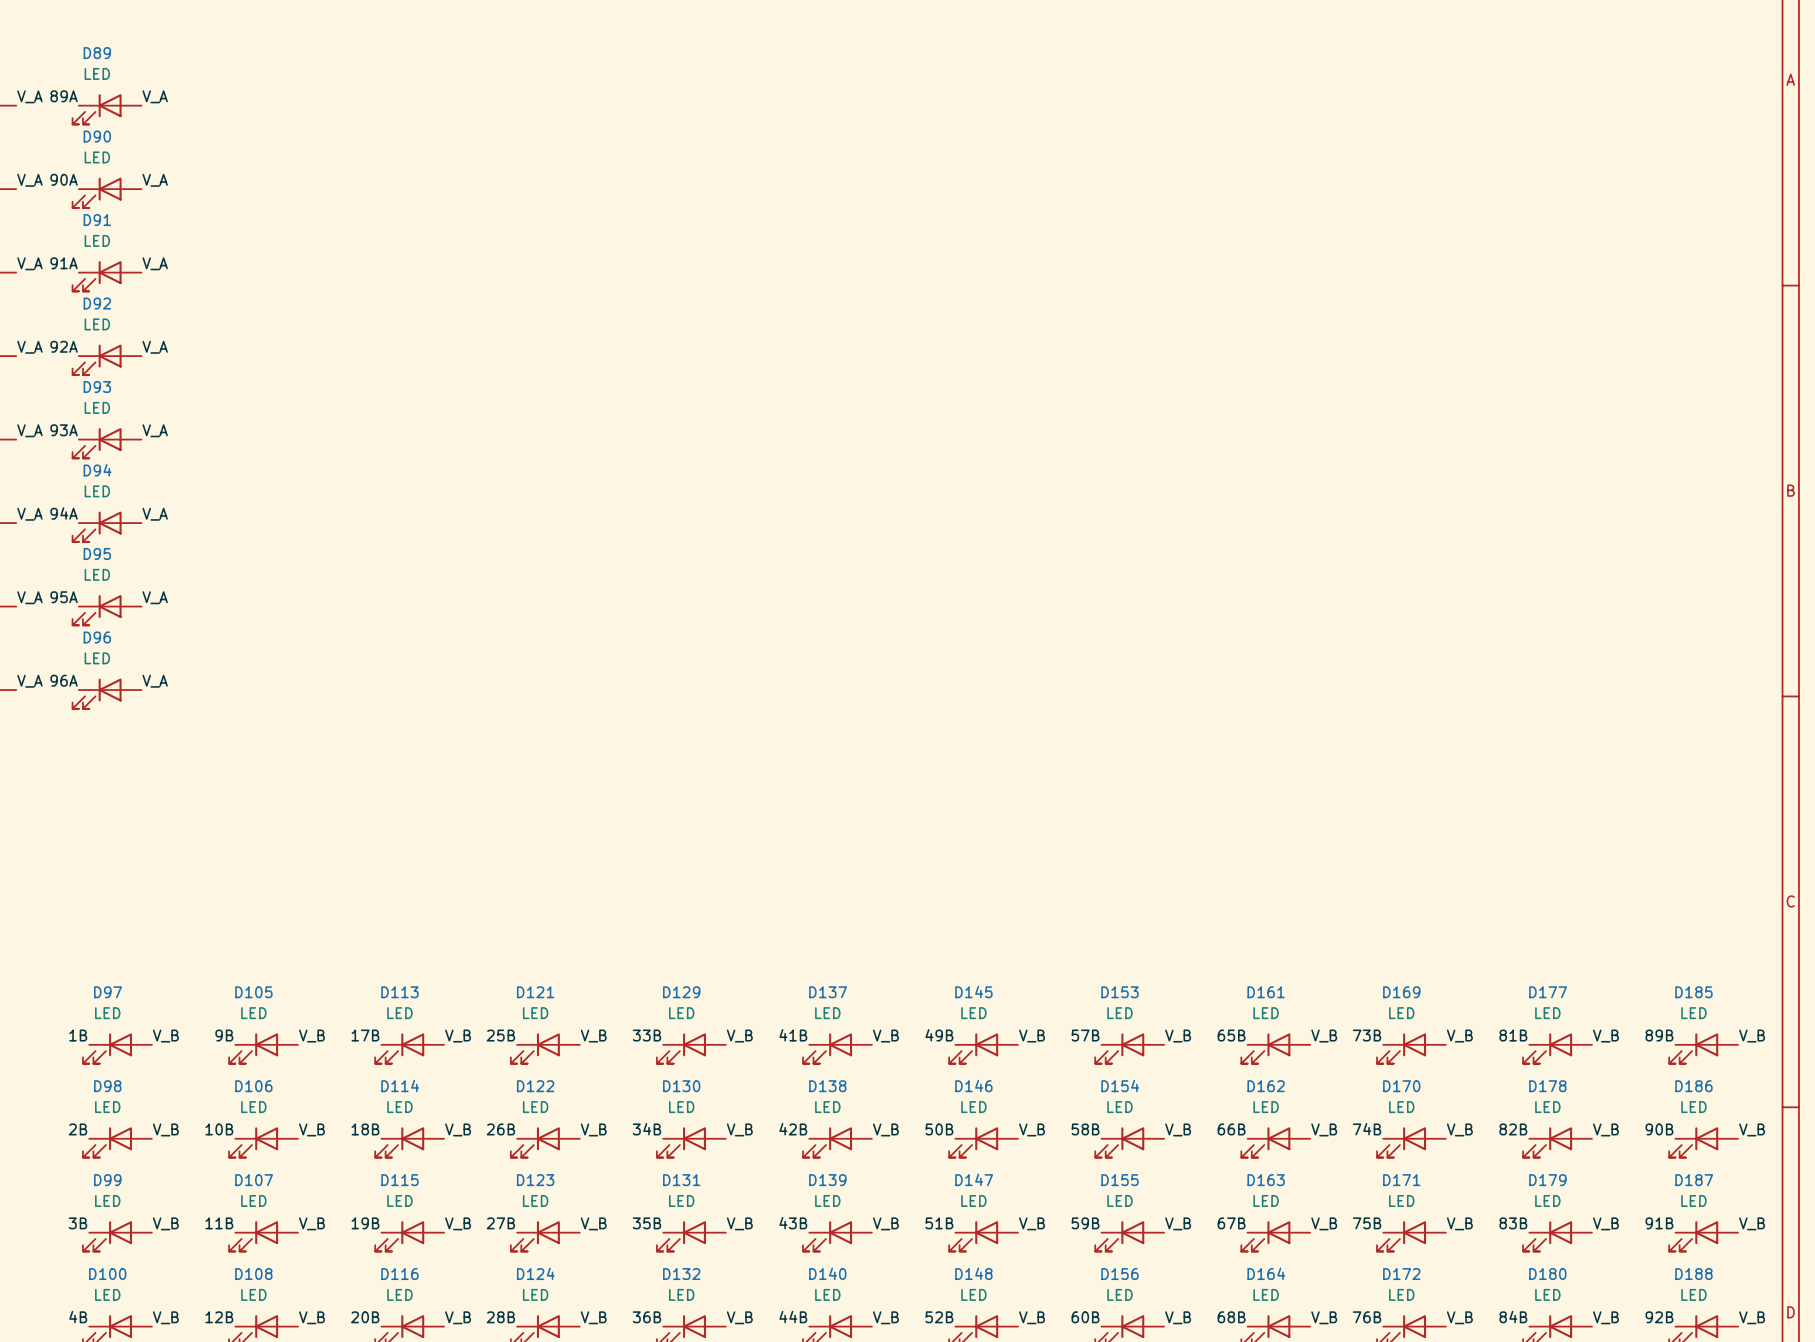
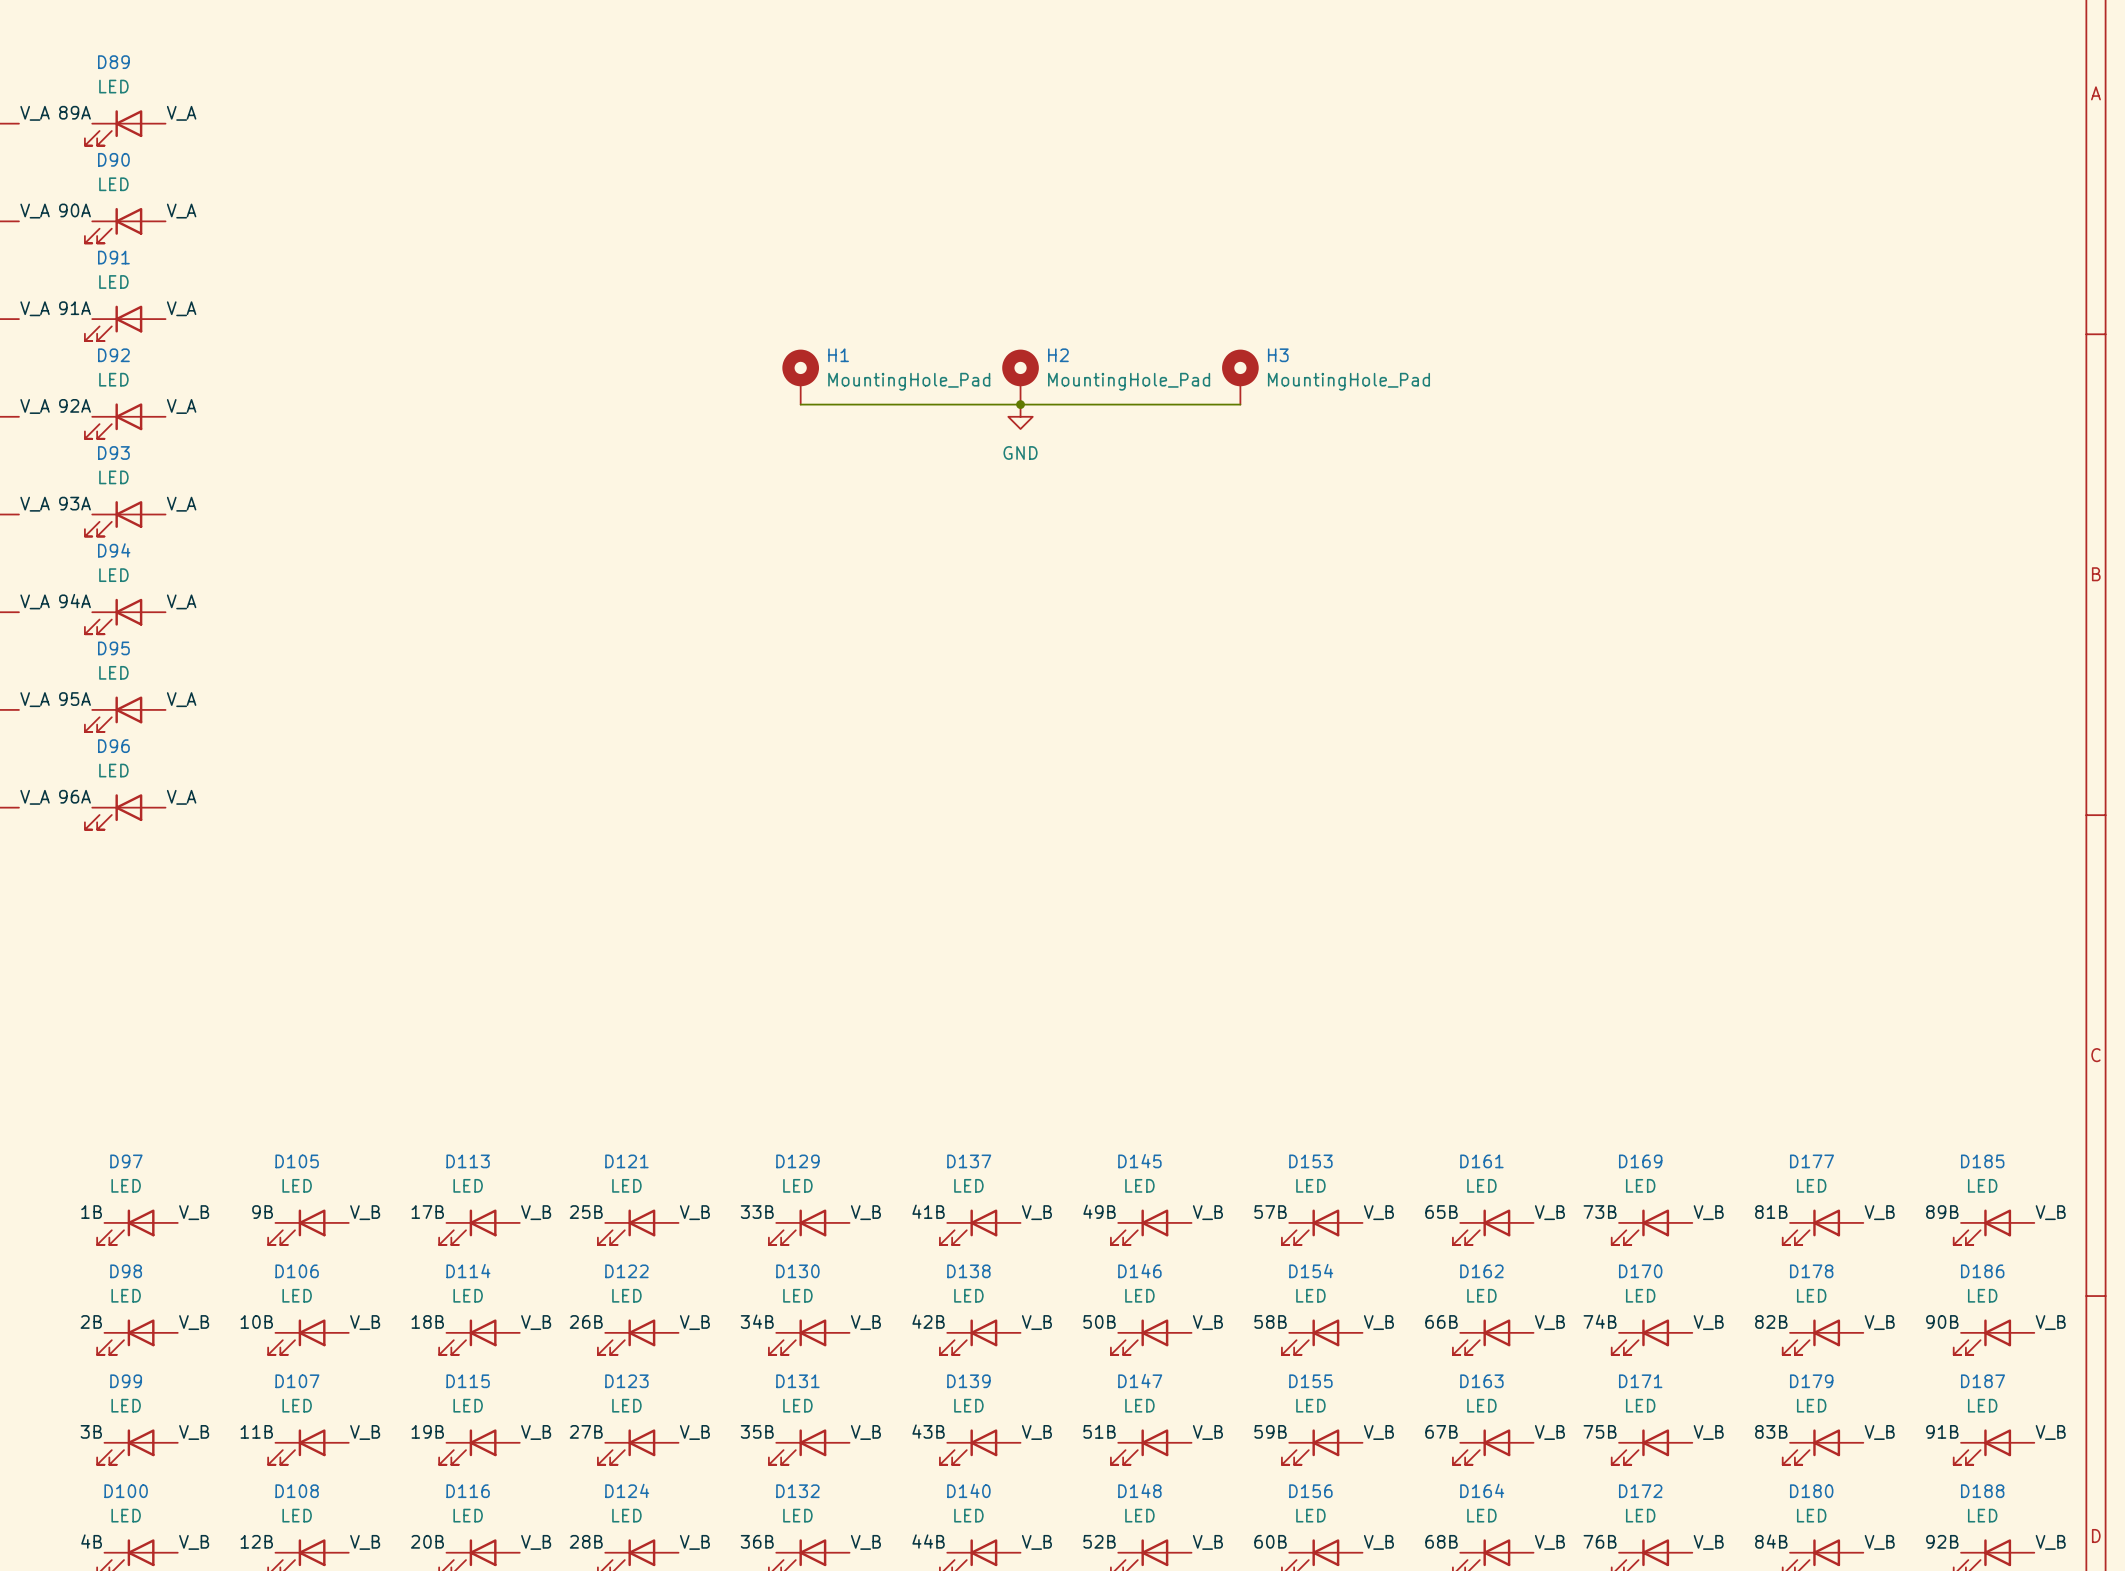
H1: none -> MountingHole_Pad (800, 377)
H2: none -> MountingHole_Pad (1020, 377)
H3: none -> MountingHole_Pad (1240, 377)
wire: none -> (800, 404) (1240, 404)
junction: none -> (1020, 404)
power symbol: none -> GND (1020, 416)

